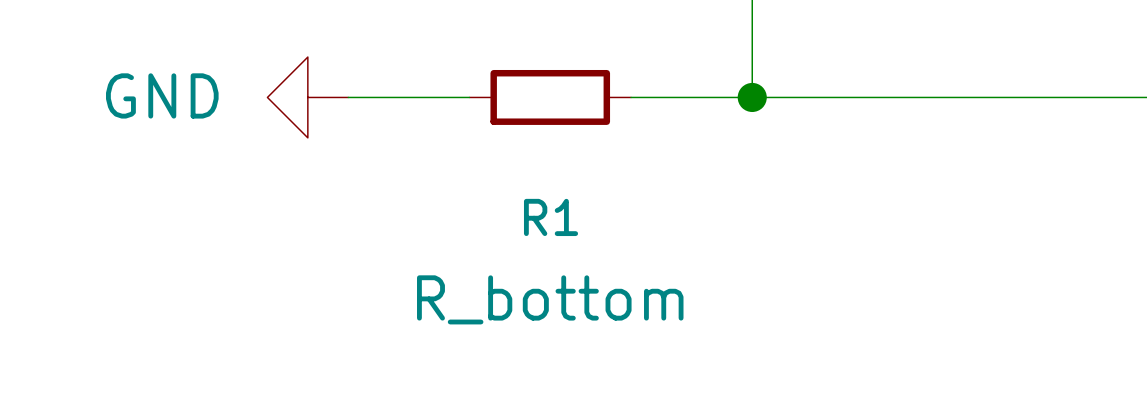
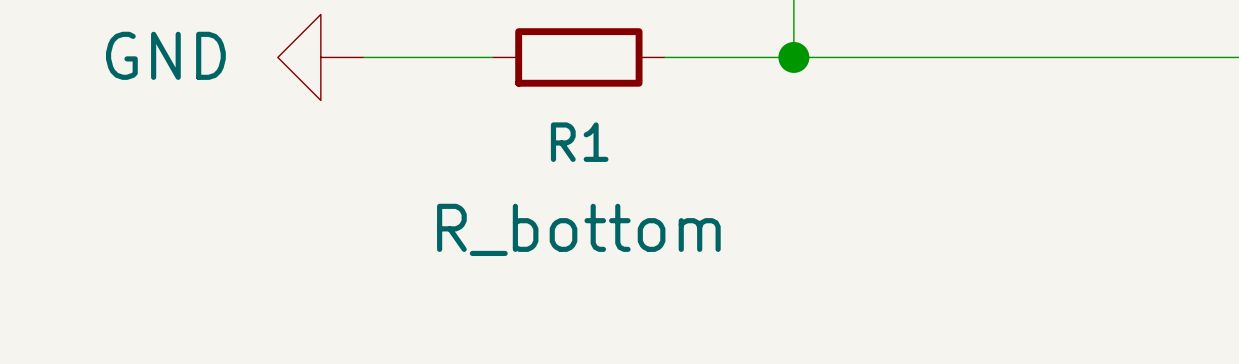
R1 name position: R1 (551, 217) -> R1 (579, 142)
R1 value position: R_bottom (550, 299) -> R_bottom (578, 229)

